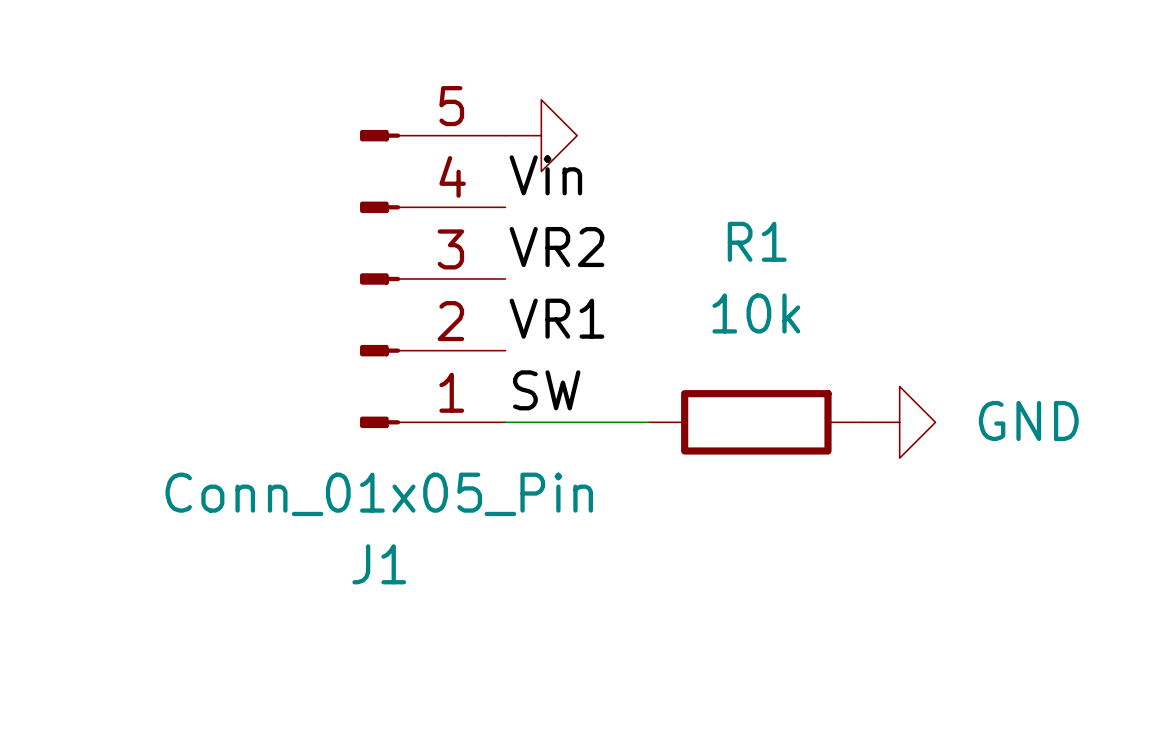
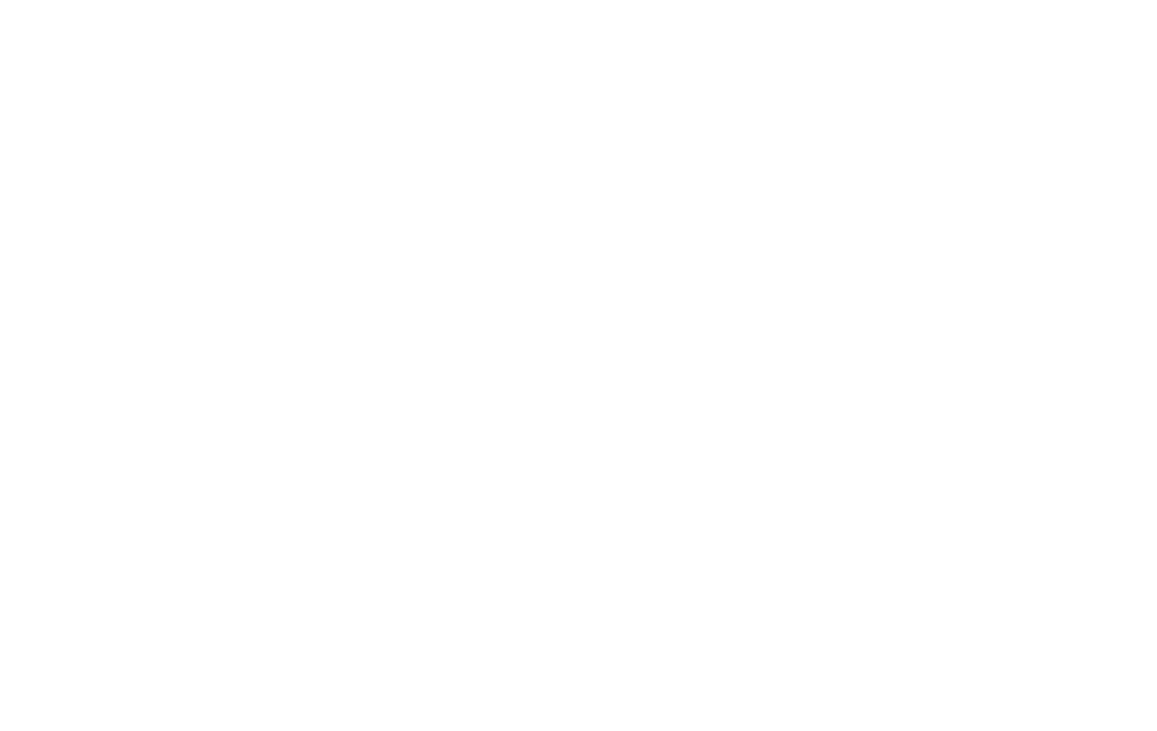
power symbol: (541, 135) -> none
label: Vin (545, 175) -> none
label: VR2 (556, 247) -> none
J1: Conn_01x05_Pin (432, 278) -> none
label: VR1 (556, 318) -> none
label: SW (546, 390) -> none
wire: (505, 422) (648, 422) -> none
R1: 10k (756, 422) -> none
power symbol: GND (899, 422) -> none

